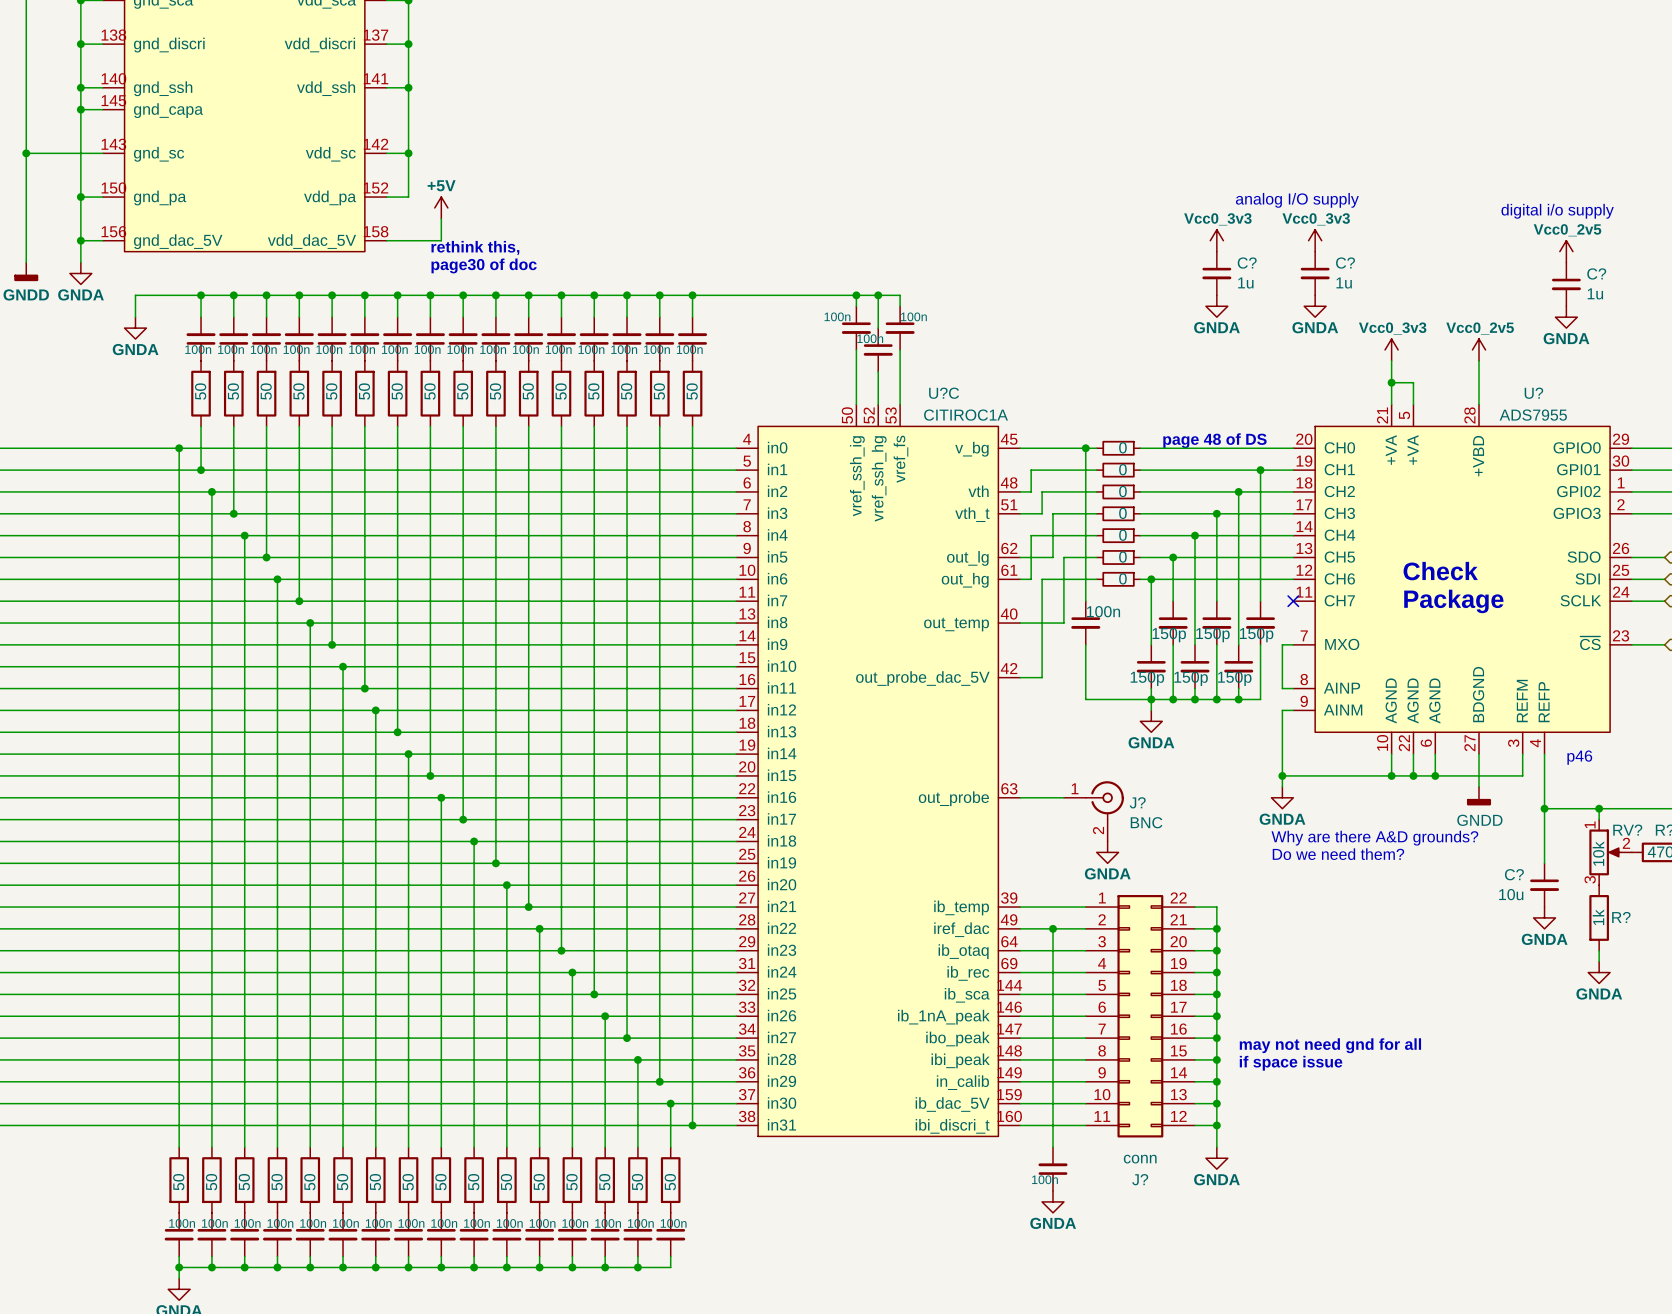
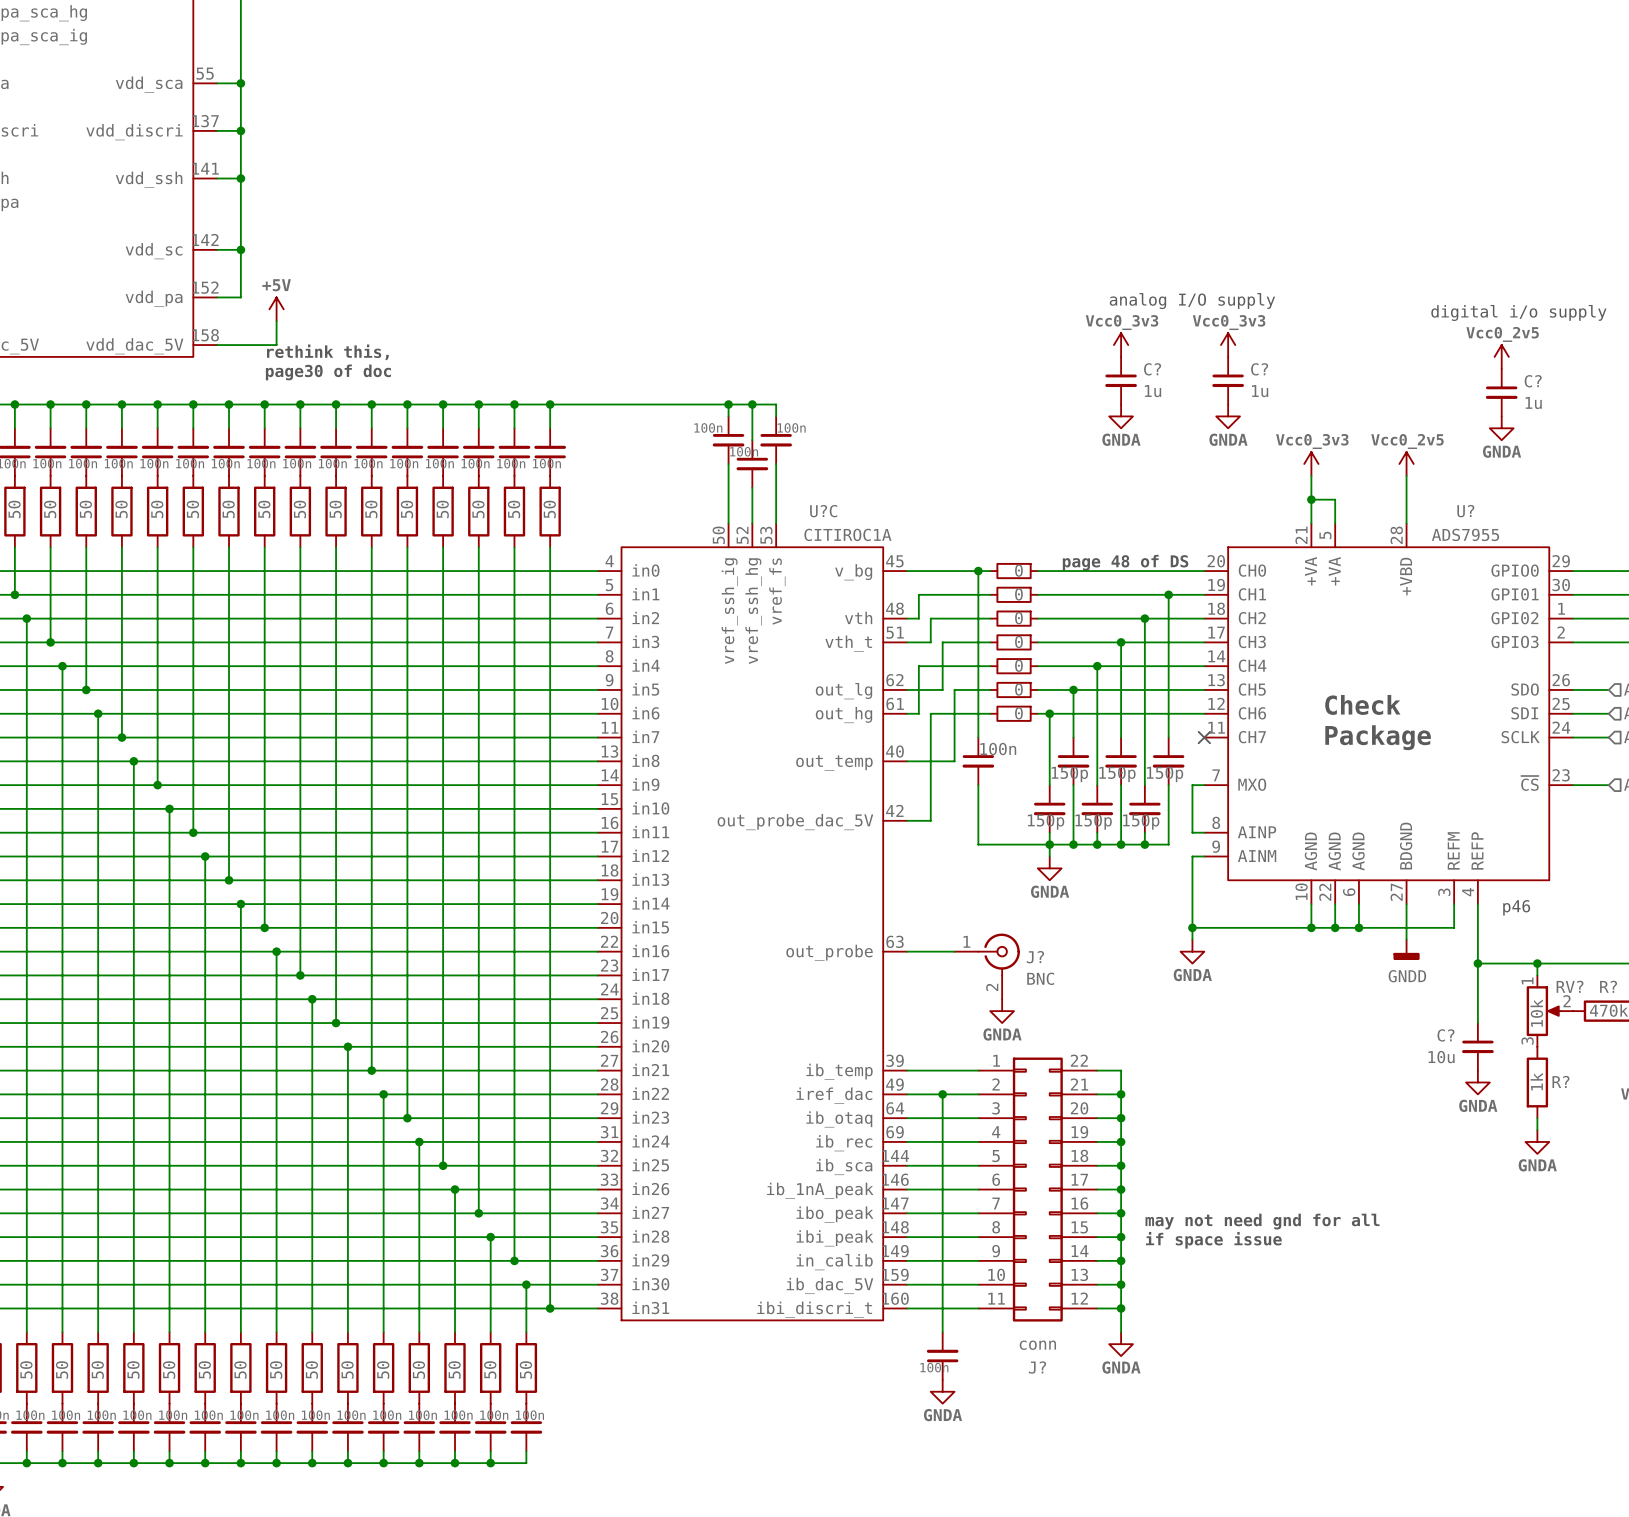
text: Why are there A&D grounds? (1374, 838) -> none
text: Do we need them? (1338, 854) -> none

